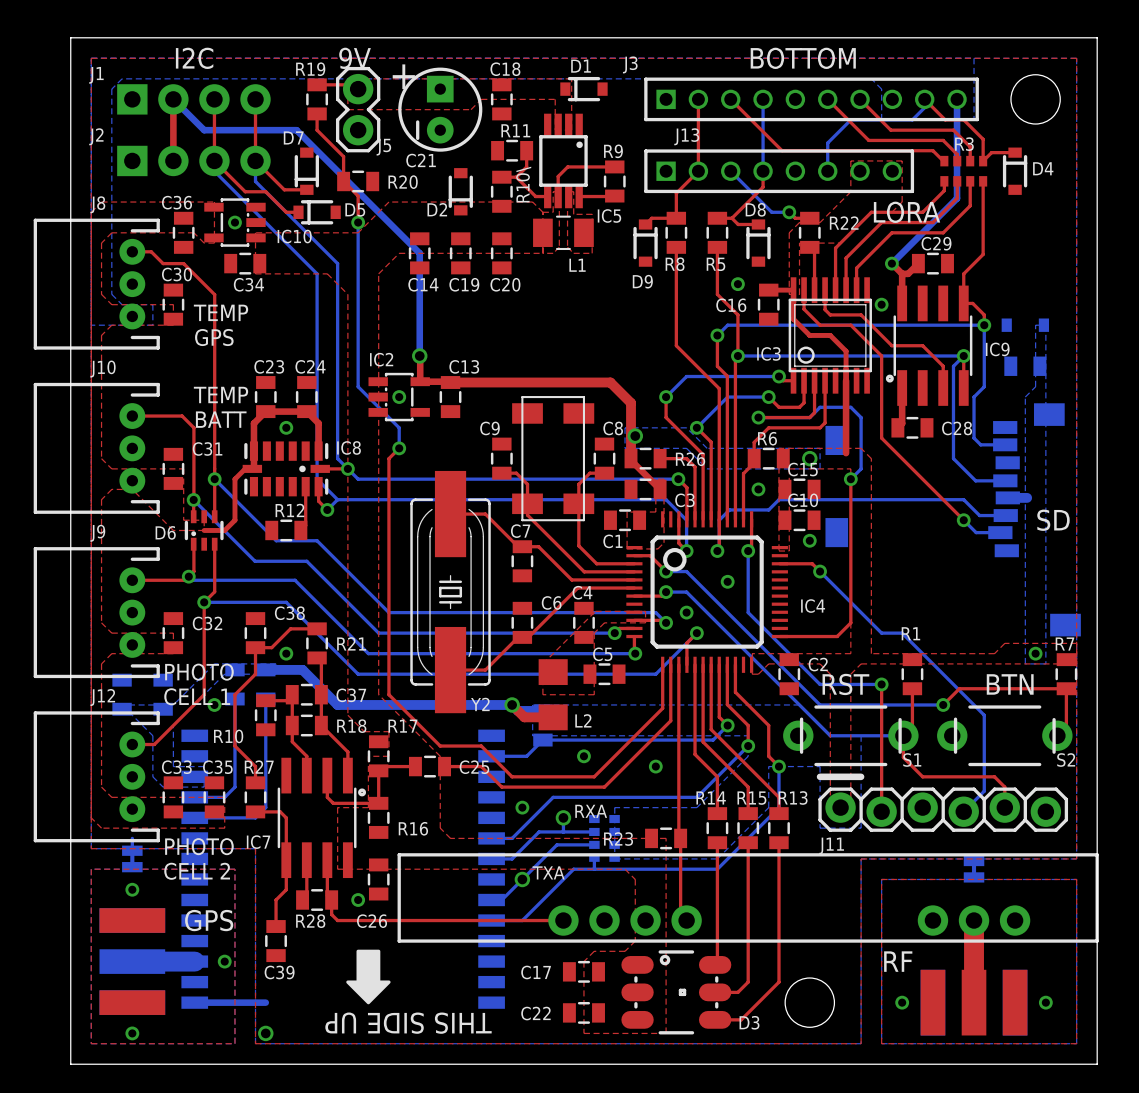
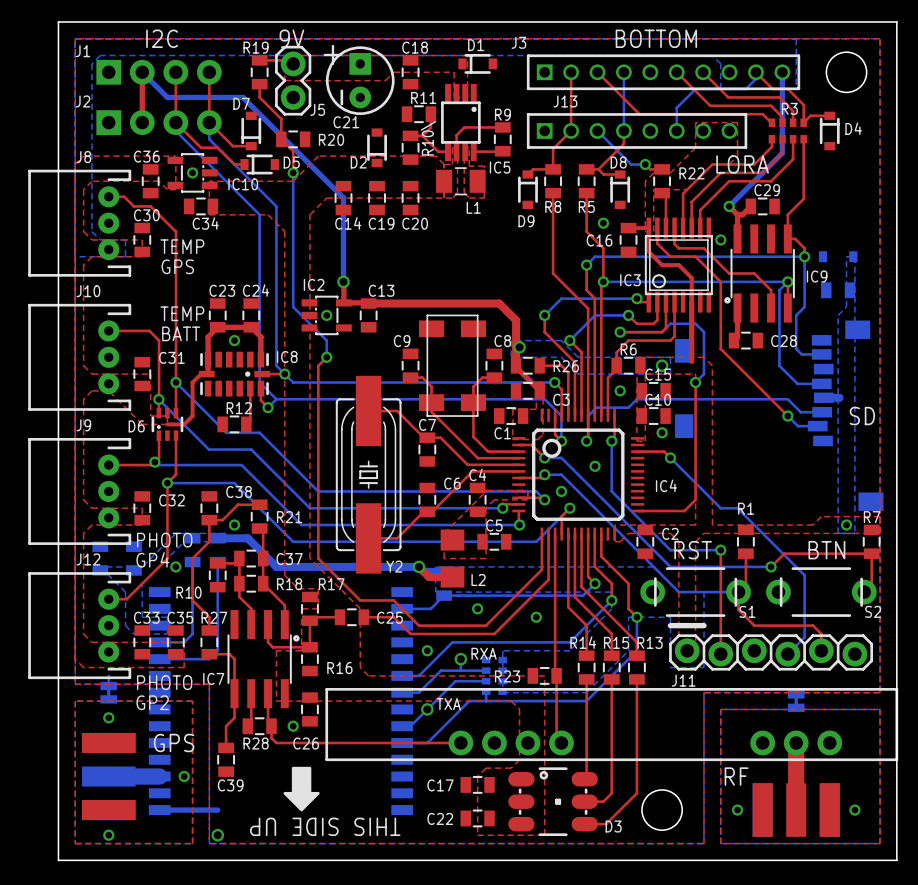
text: CELL 1 (197, 696) -> GP4 (152, 559)
text: CELL 2 (197, 871) -> GP2 (152, 702)

